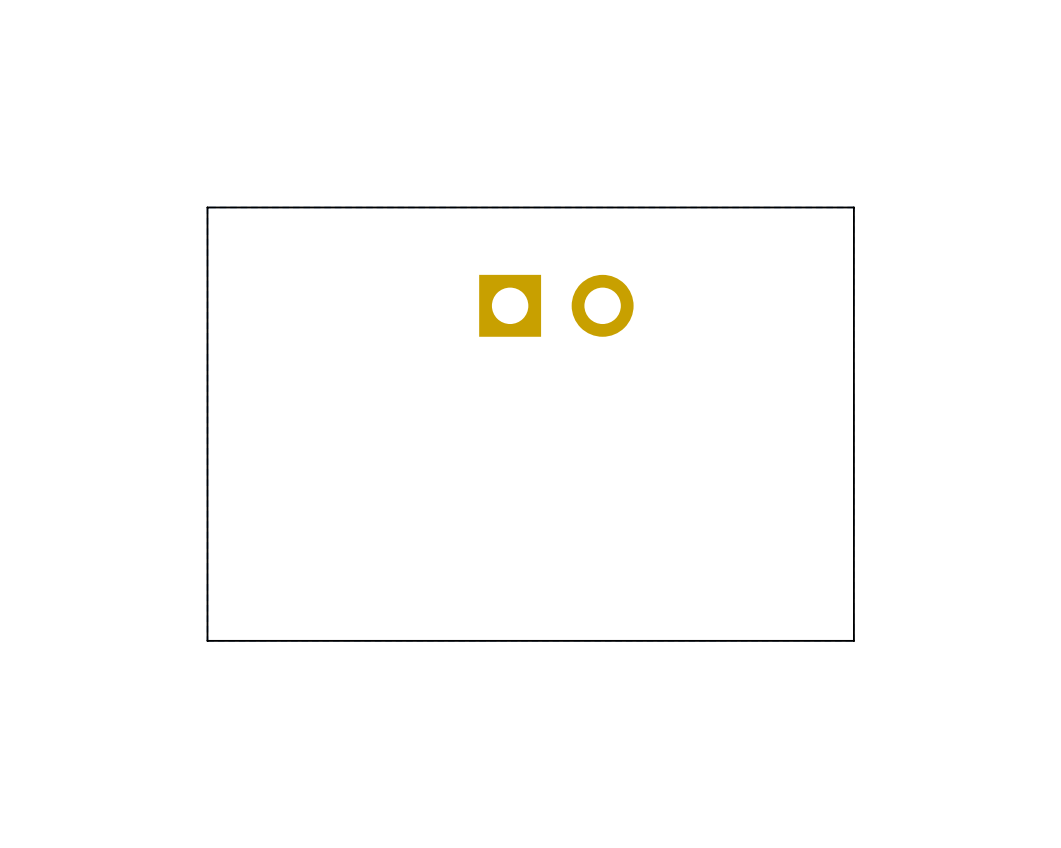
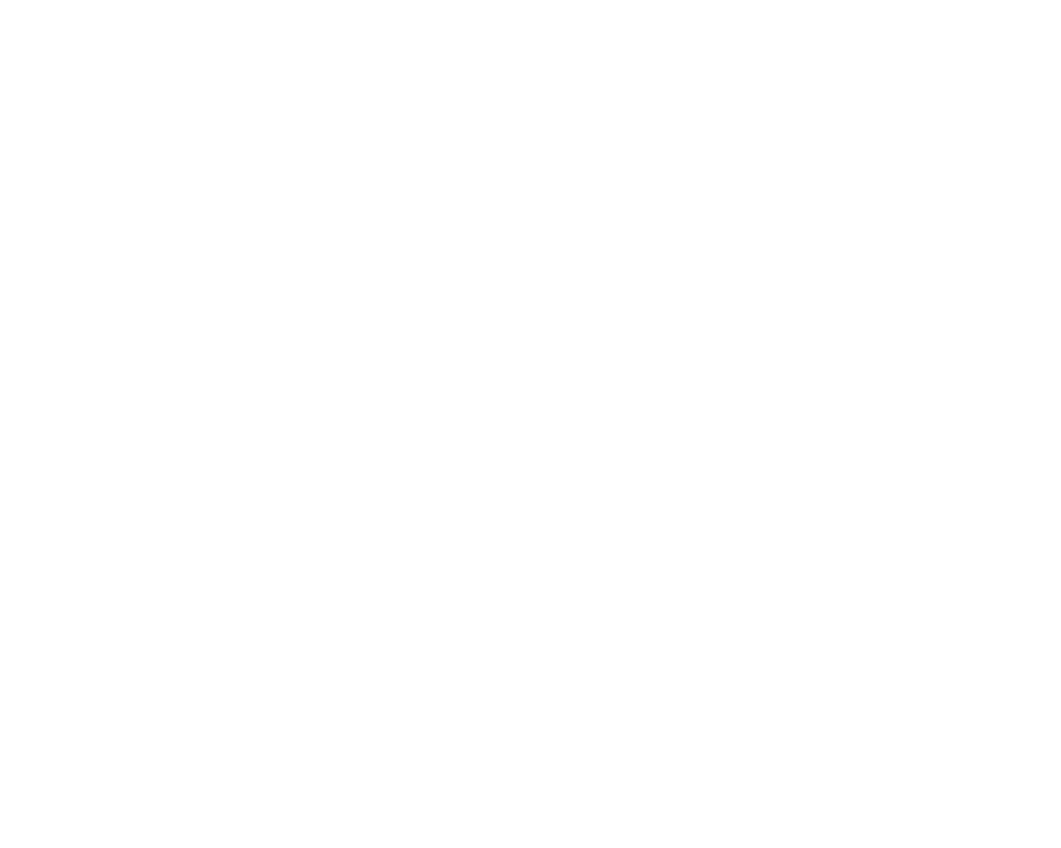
board edge: (853, 207) (207, 207) (207, 640) (853, 640) (853, 207) -> none
part: (556, 305) -> none

